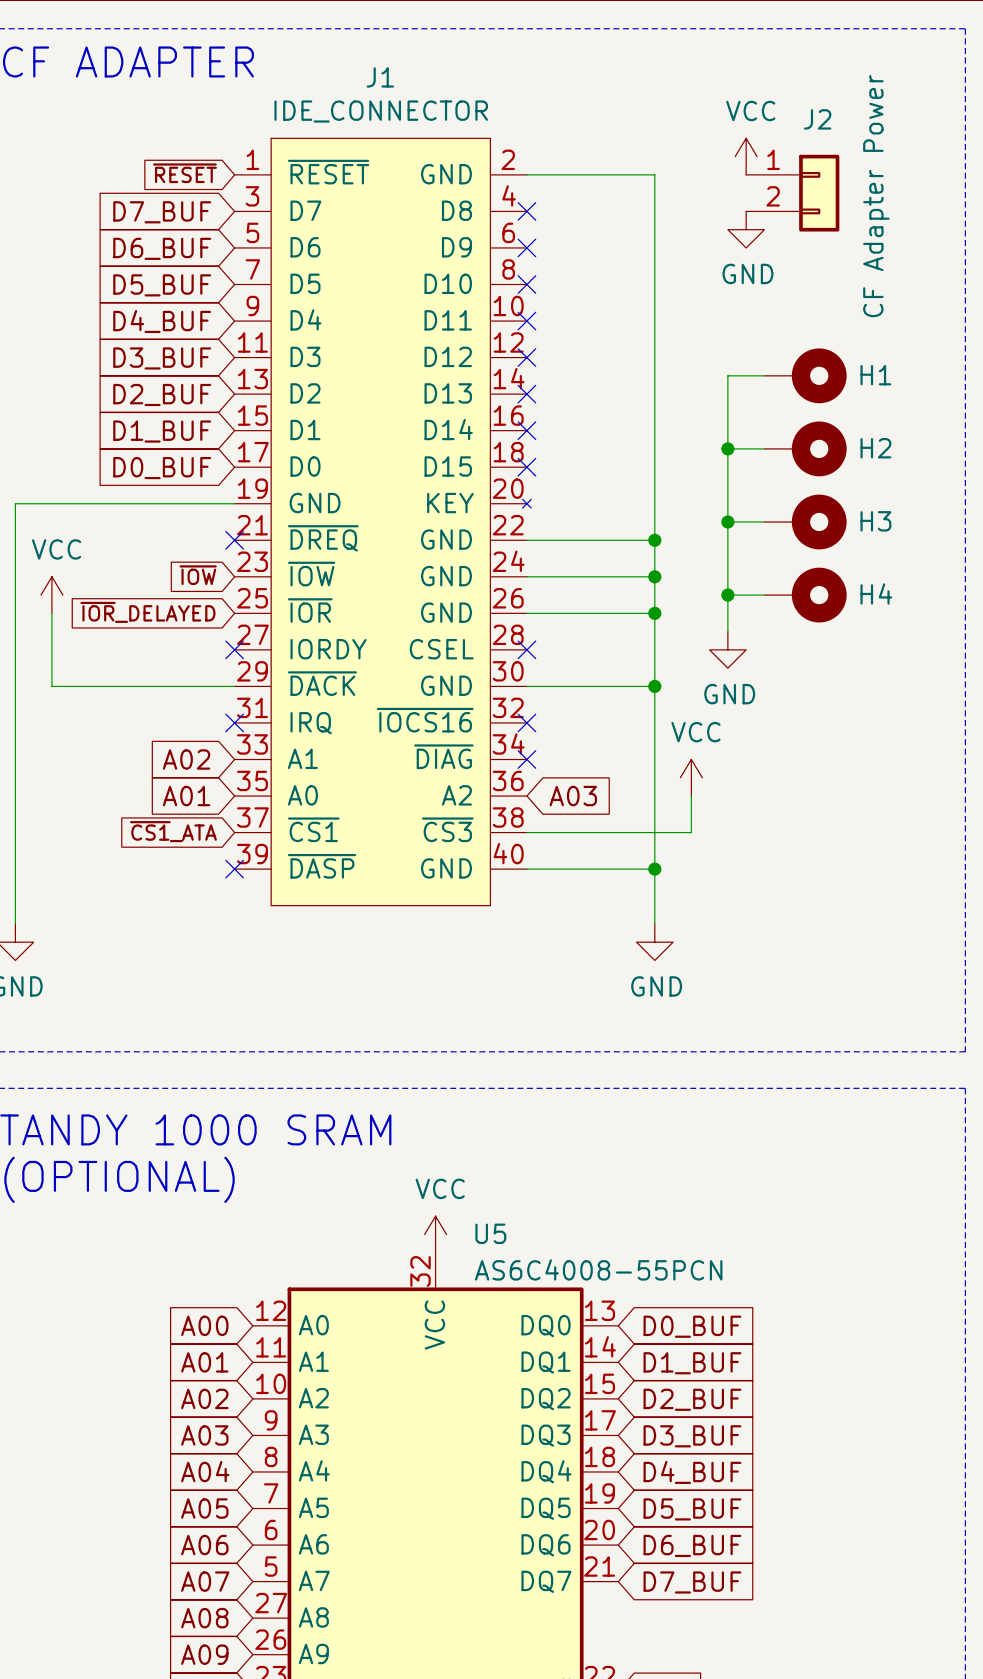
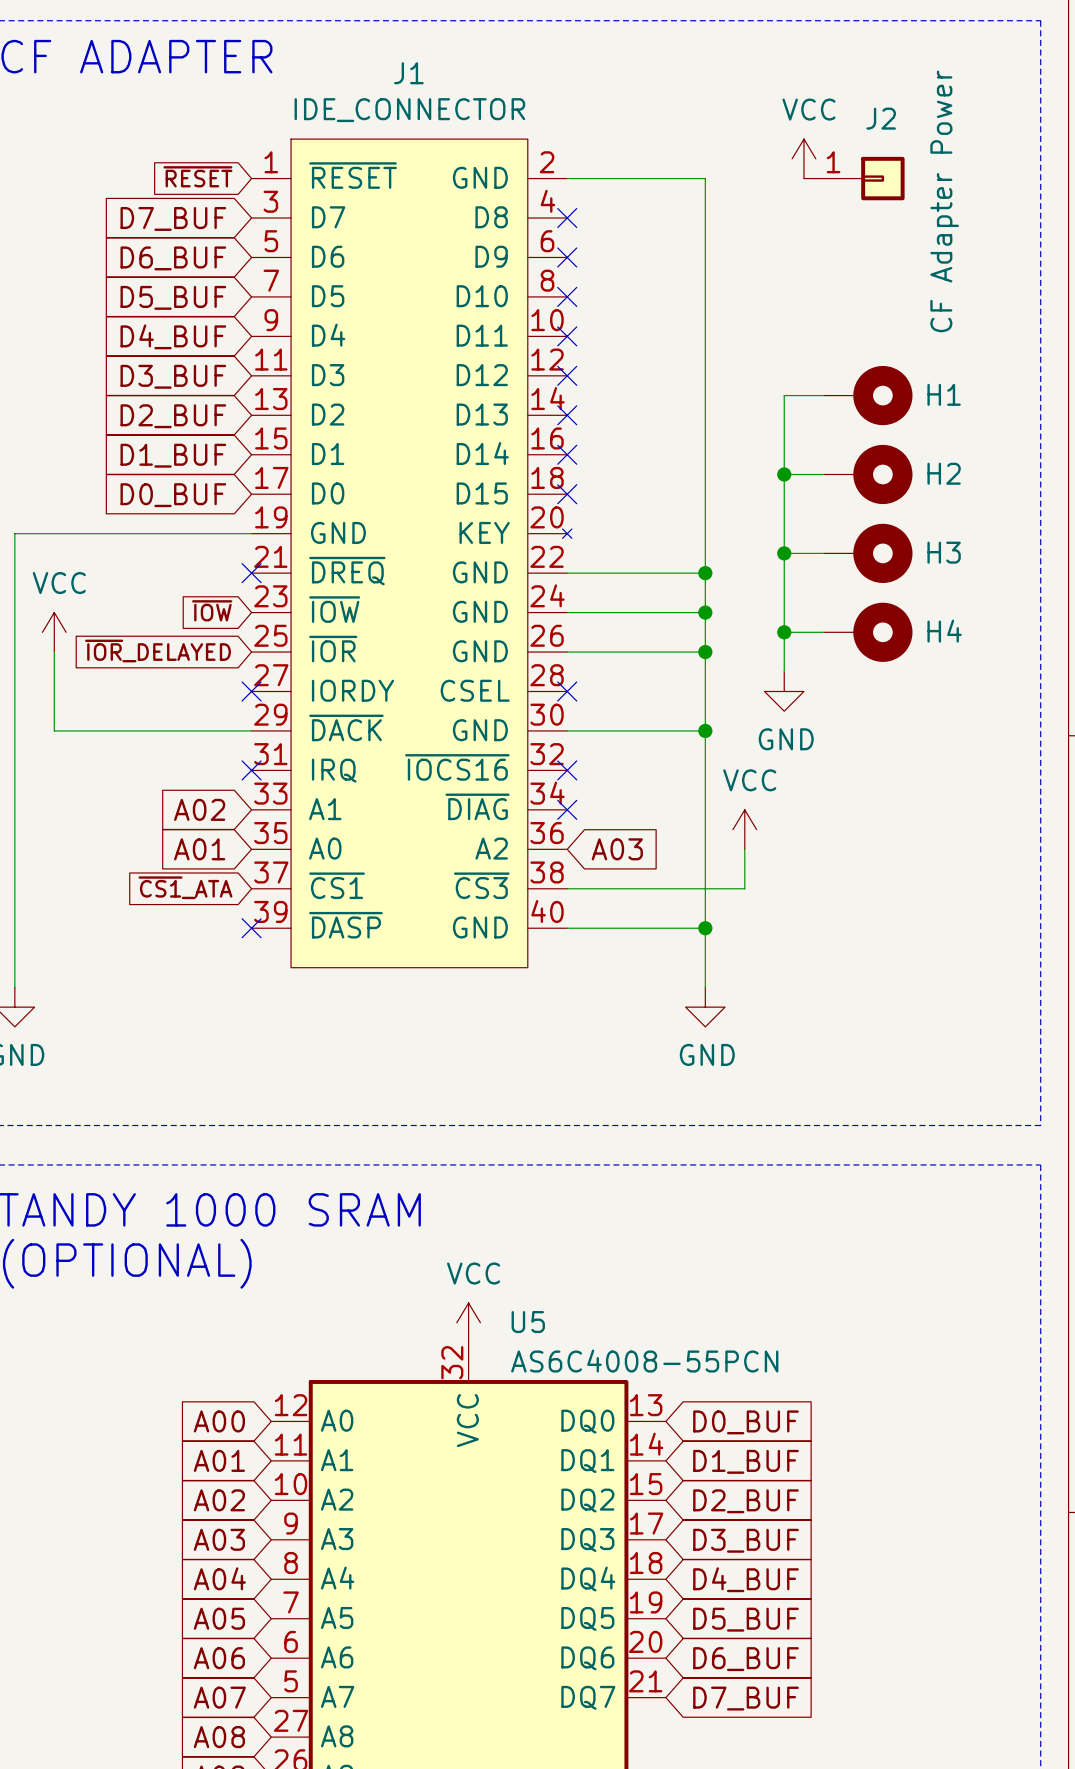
J2 symbol: [746, 154, 840, 232] -> [803, 156, 905, 201]
power symbol: GND (746, 229) -> none

